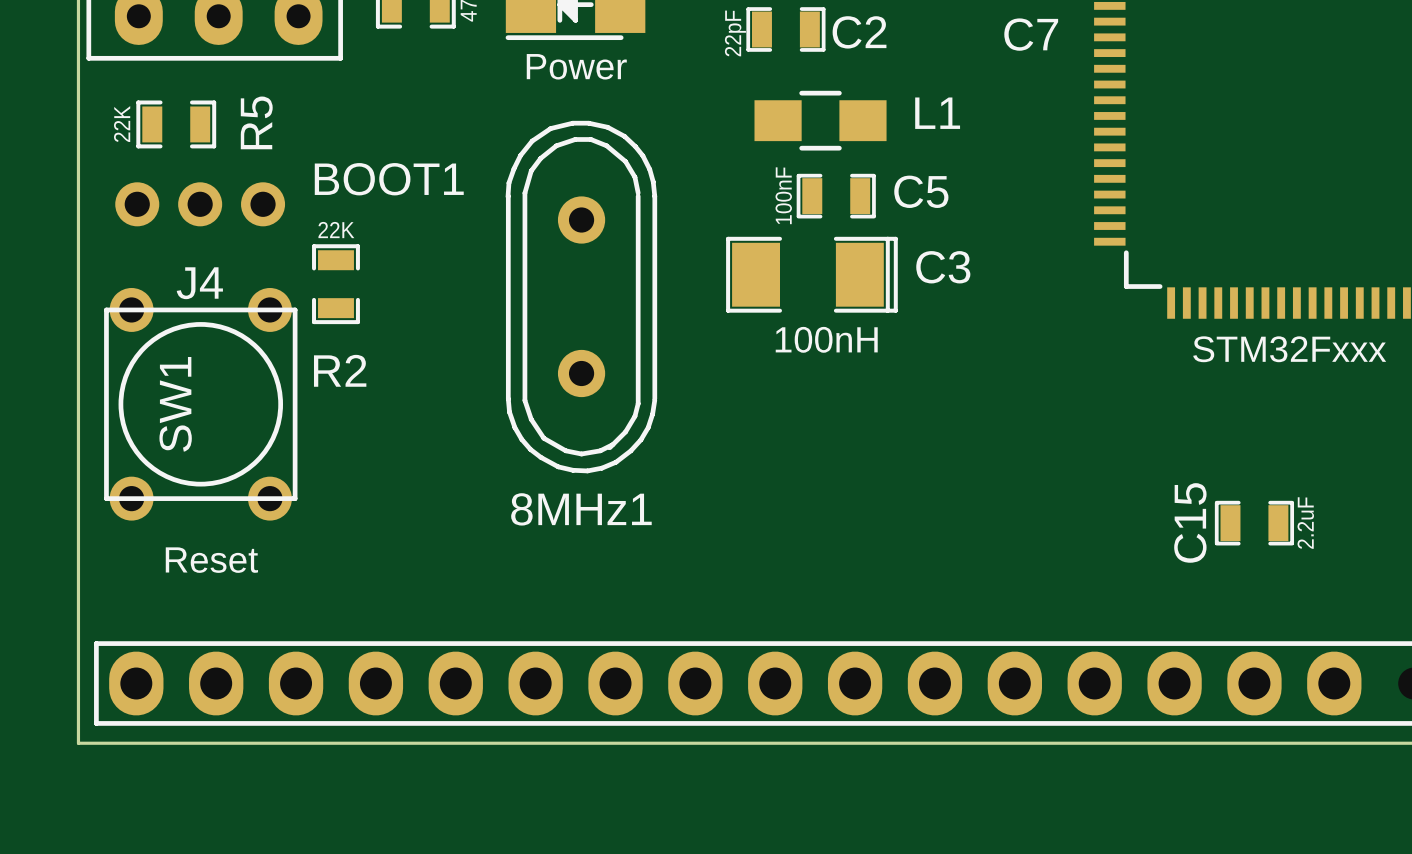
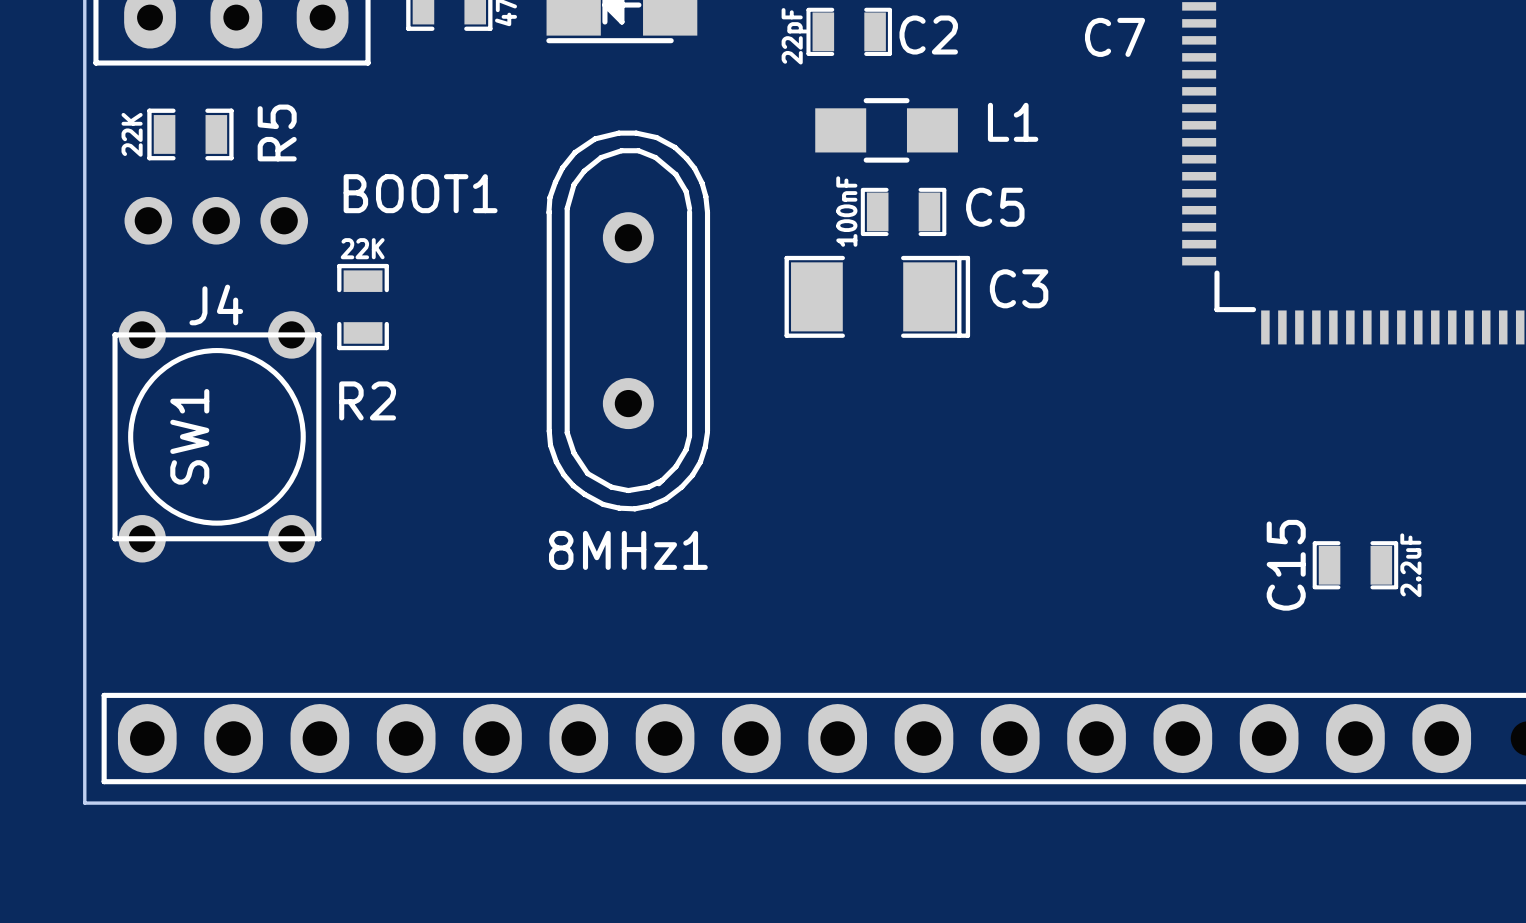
part value: Power (576, 66) -> none
L1 value: 100nH (826, 339) -> none
part value: STM32Fxxx (1289, 349) -> none
SW1 value: Reset (211, 560) -> none

